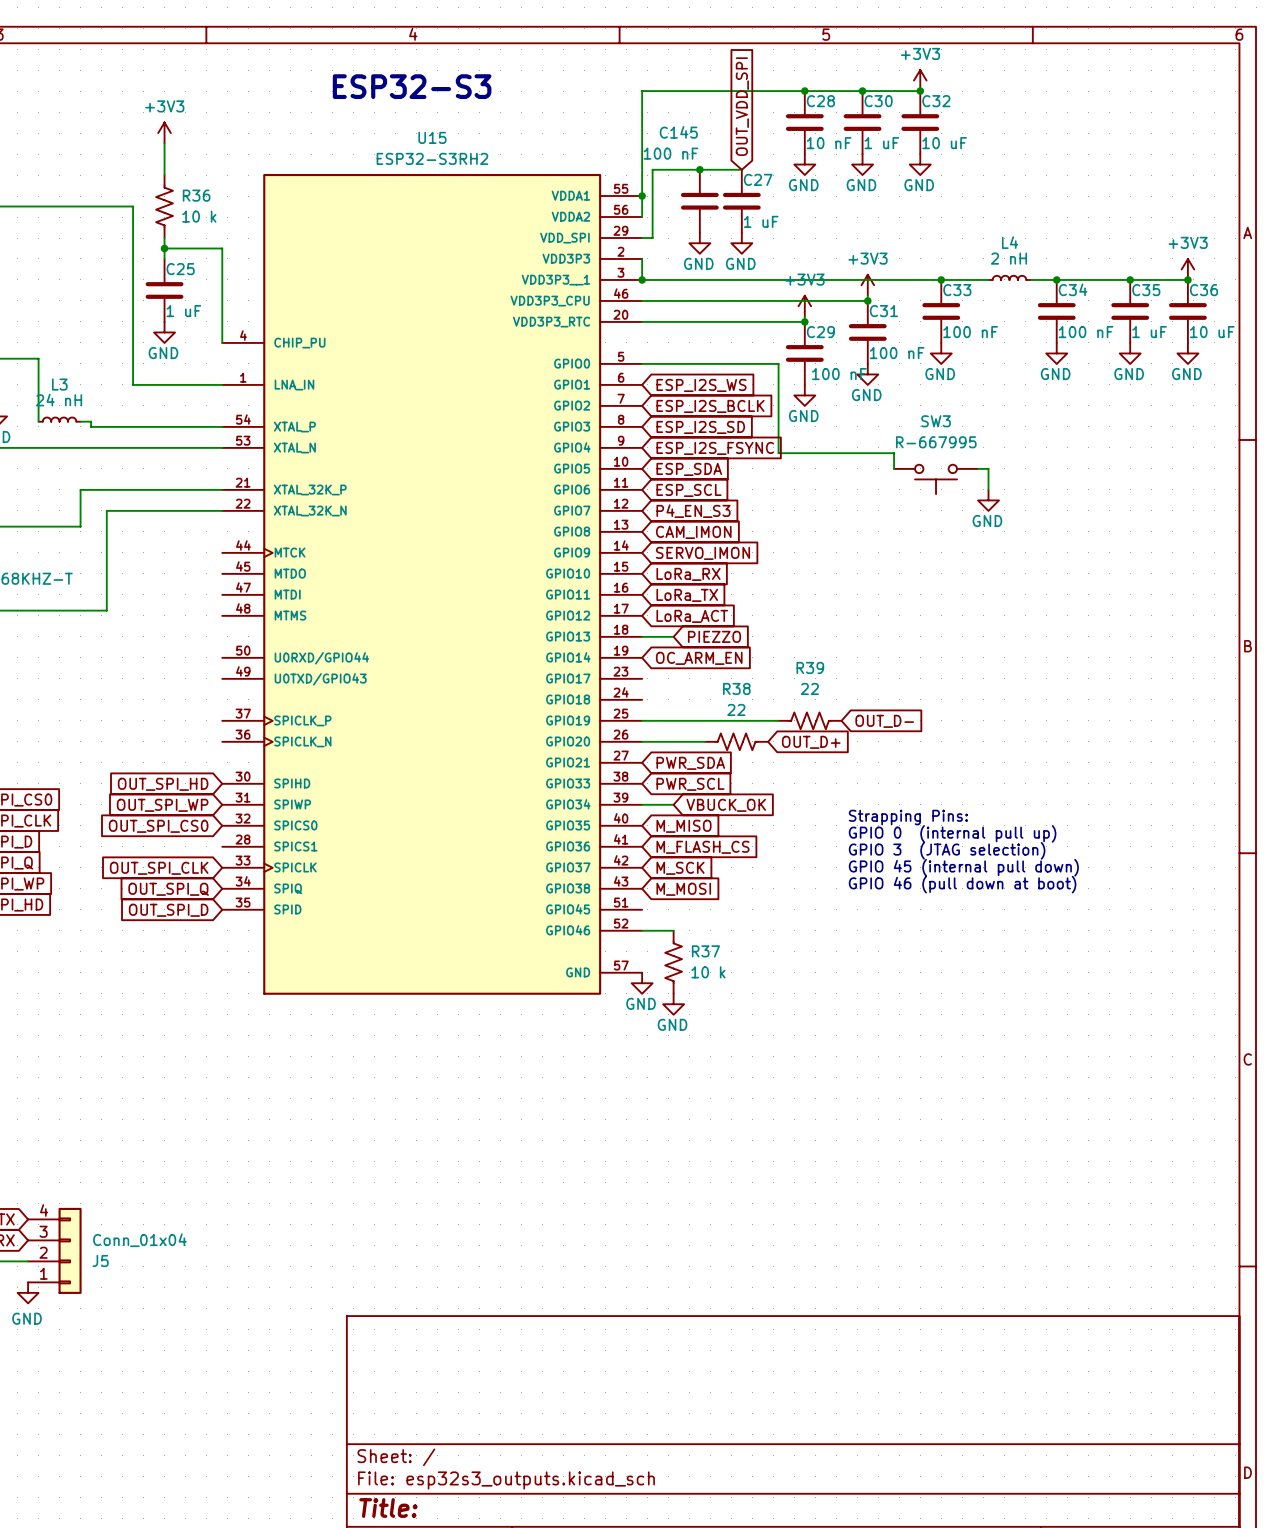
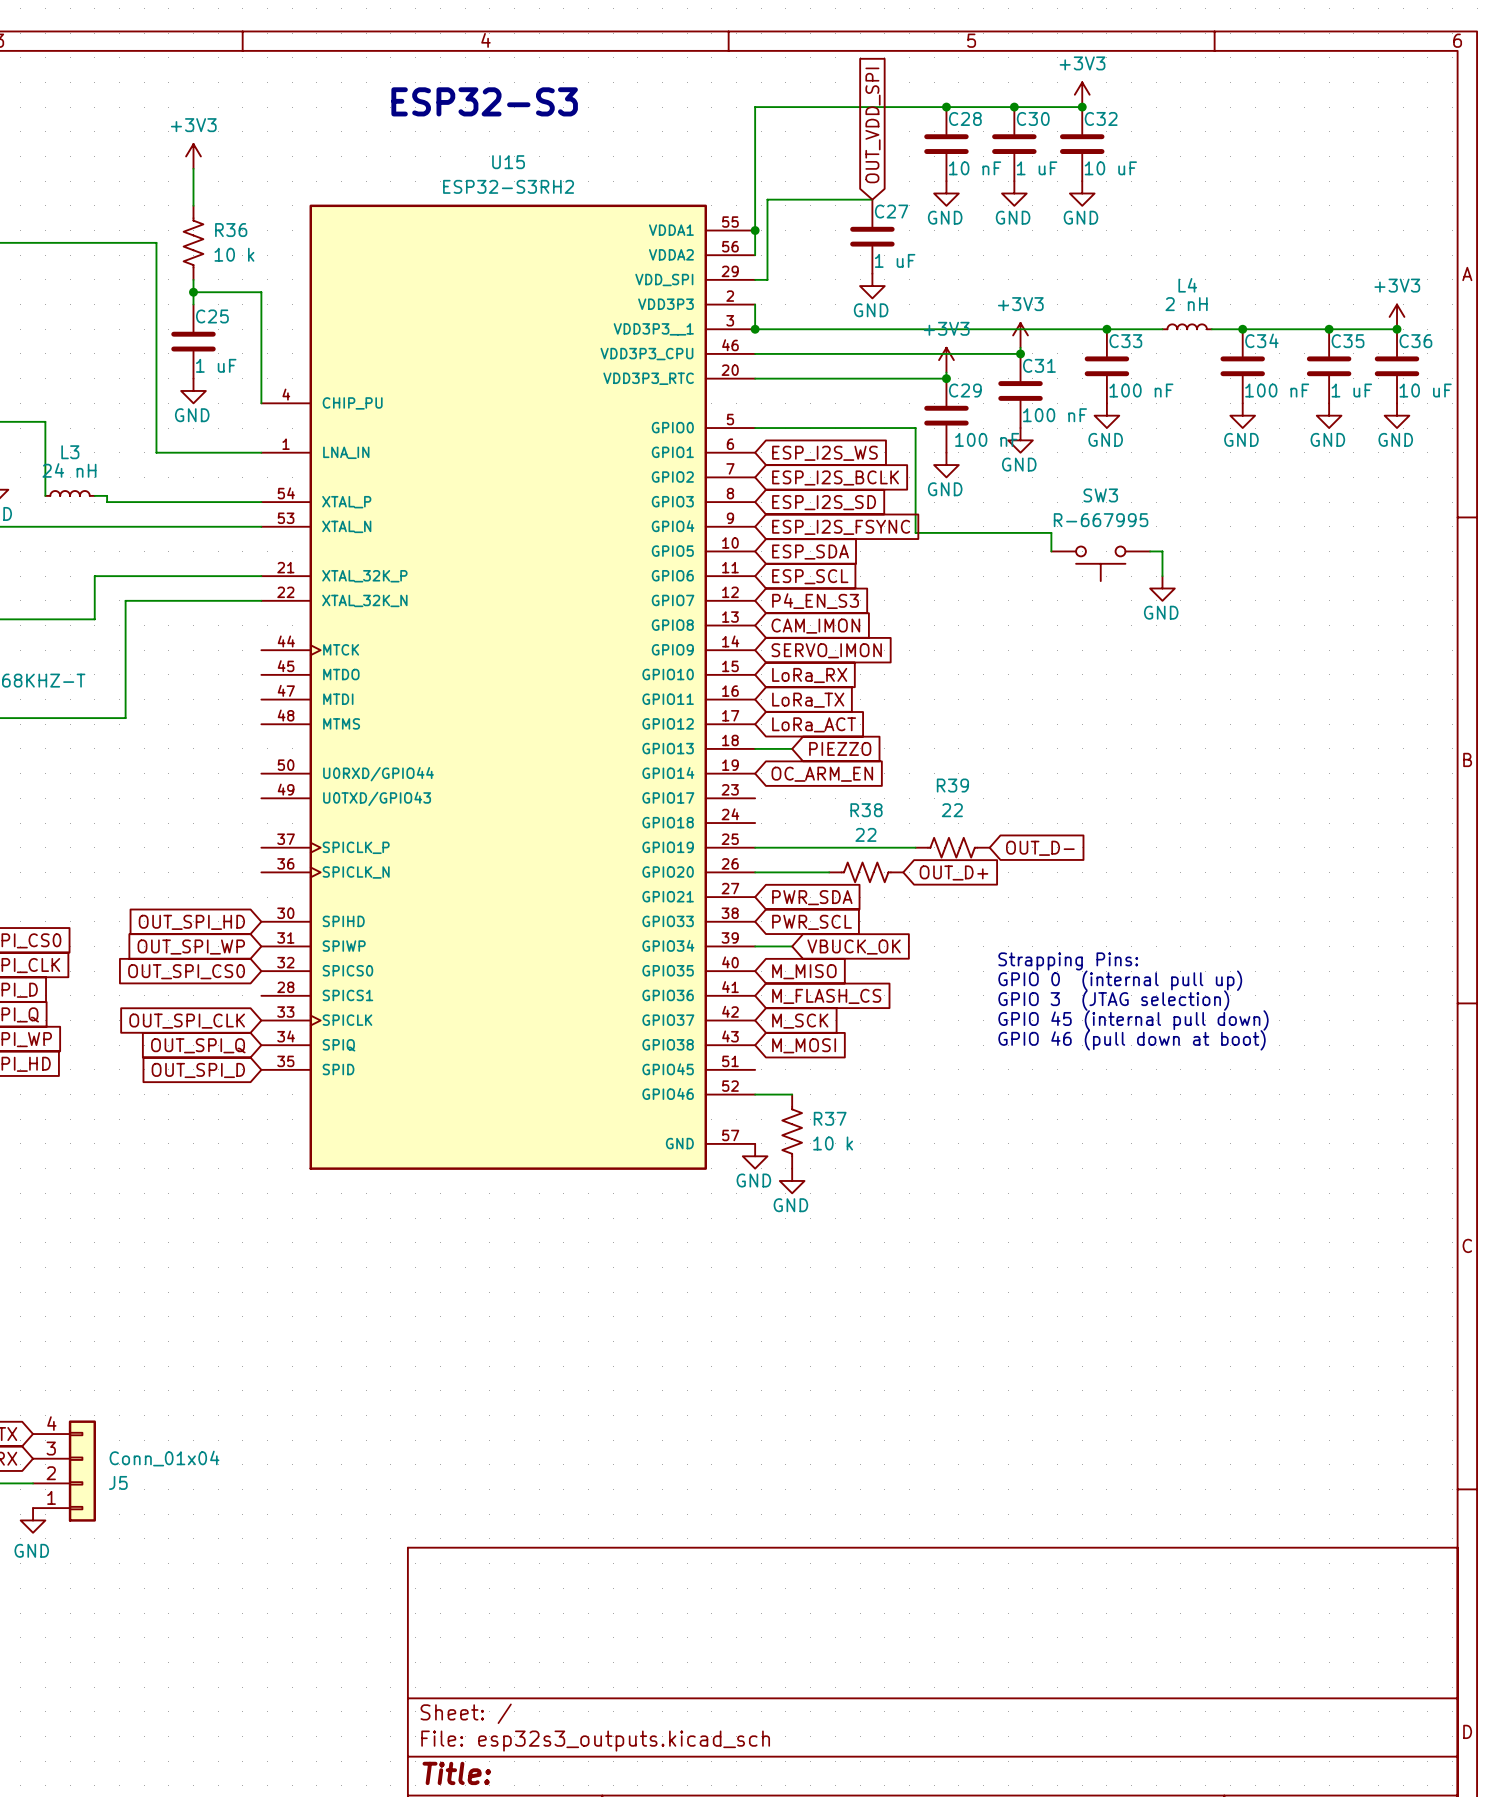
junction: (699, 169) -> none
C145: 100 nF (699, 201) -> none
power symbol: GND (699, 243) -> none

